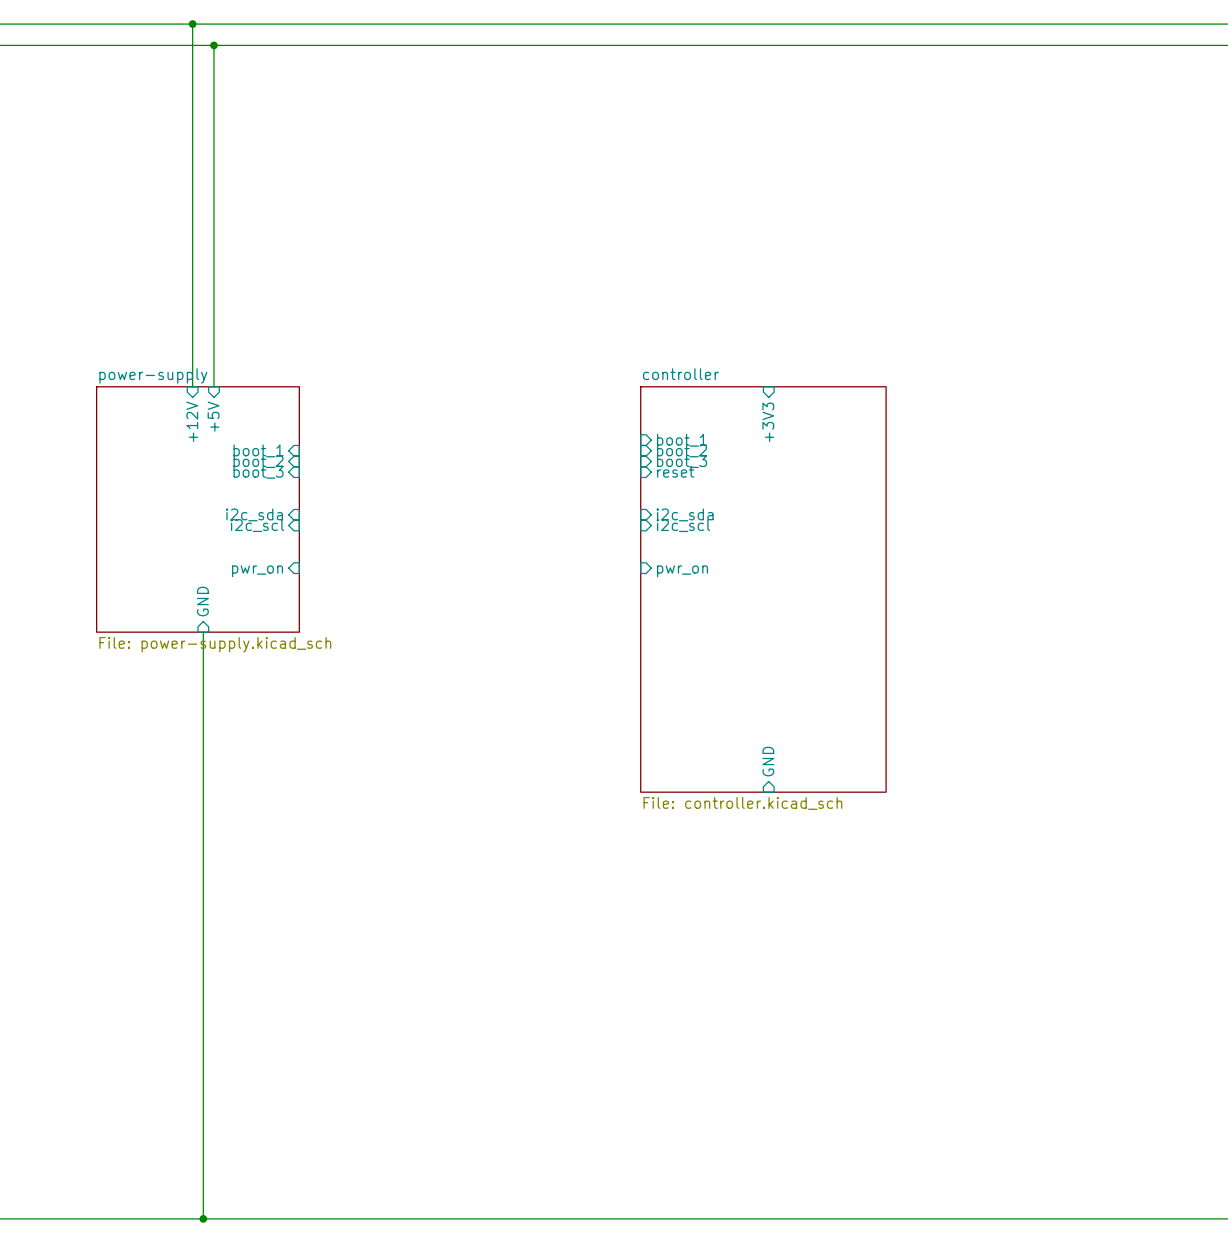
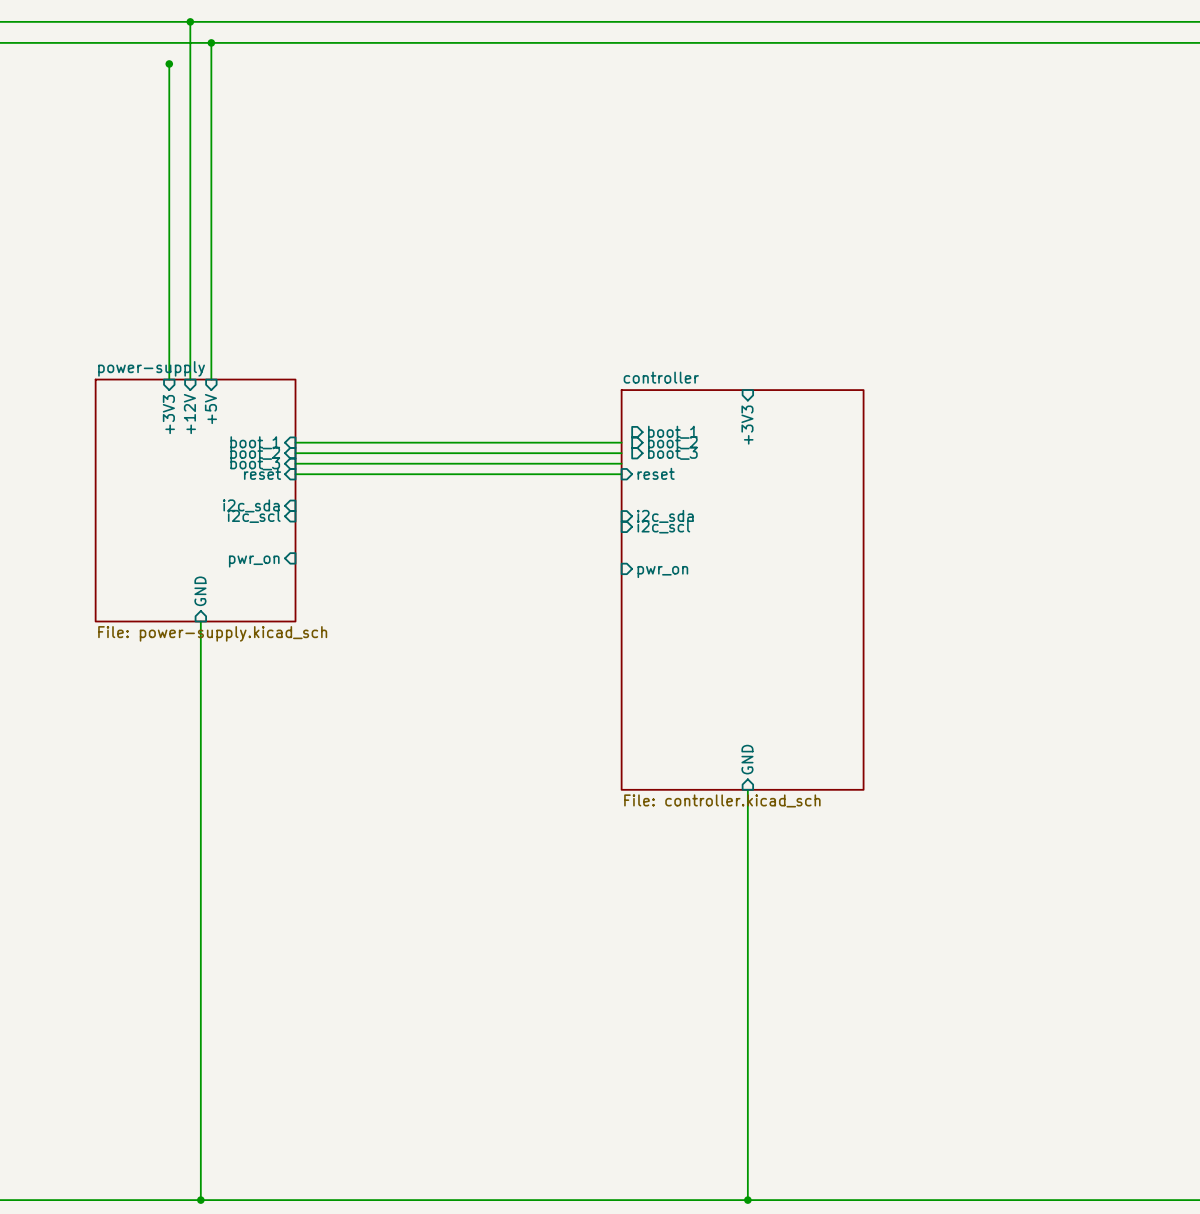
wire: none -> (169, 63) (169, 379)
junction: none -> (169, 63)
sheet pin: none -> +3V3 (168, 414)
sheet pin position: +3V3 (768, 422) -> +3V3 (747, 425)
wire: none -> (295, 442) (621, 442)
wire: none -> (295, 453) (621, 453)
sheet pin position: reset (675, 471) -> reset (656, 473)
wire: none -> (295, 463) (621, 463)
sheet pin: none -> reset (262, 473)
wire: none -> (295, 474) (621, 474)
sheet pin position: i2c_sda (685, 514) -> i2c_sda (665, 516)
sheet pin position: i2c_scl (683, 525) -> i2c_scl (663, 526)
sheet pin position: pwr_on (682, 571) -> pwr_on (662, 572)
sheet controller position: (763, 589) -> (742, 589)
sheet pin position: GND (768, 761) -> GND (747, 759)
wire: none -> (747, 789) (747, 1200)
junction: none -> (747, 1200)

